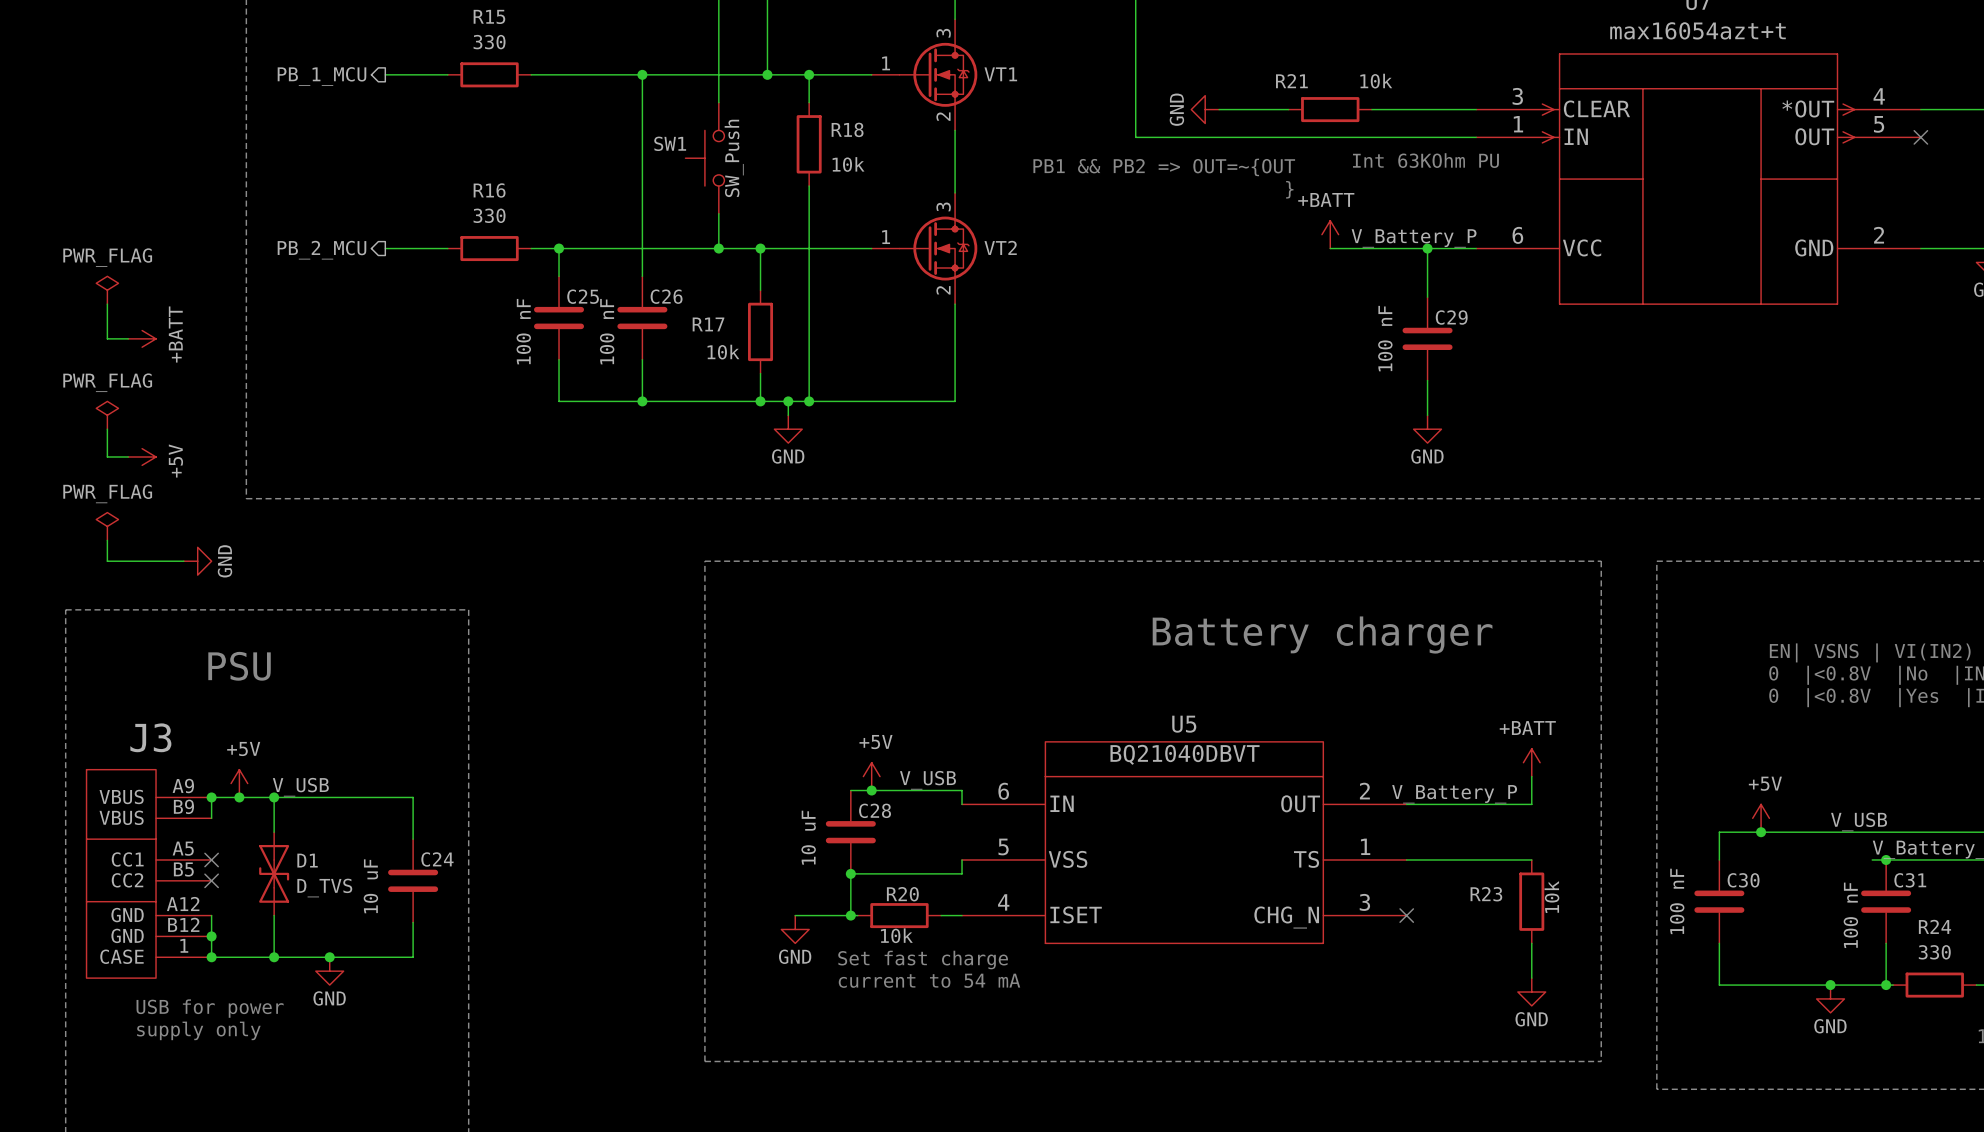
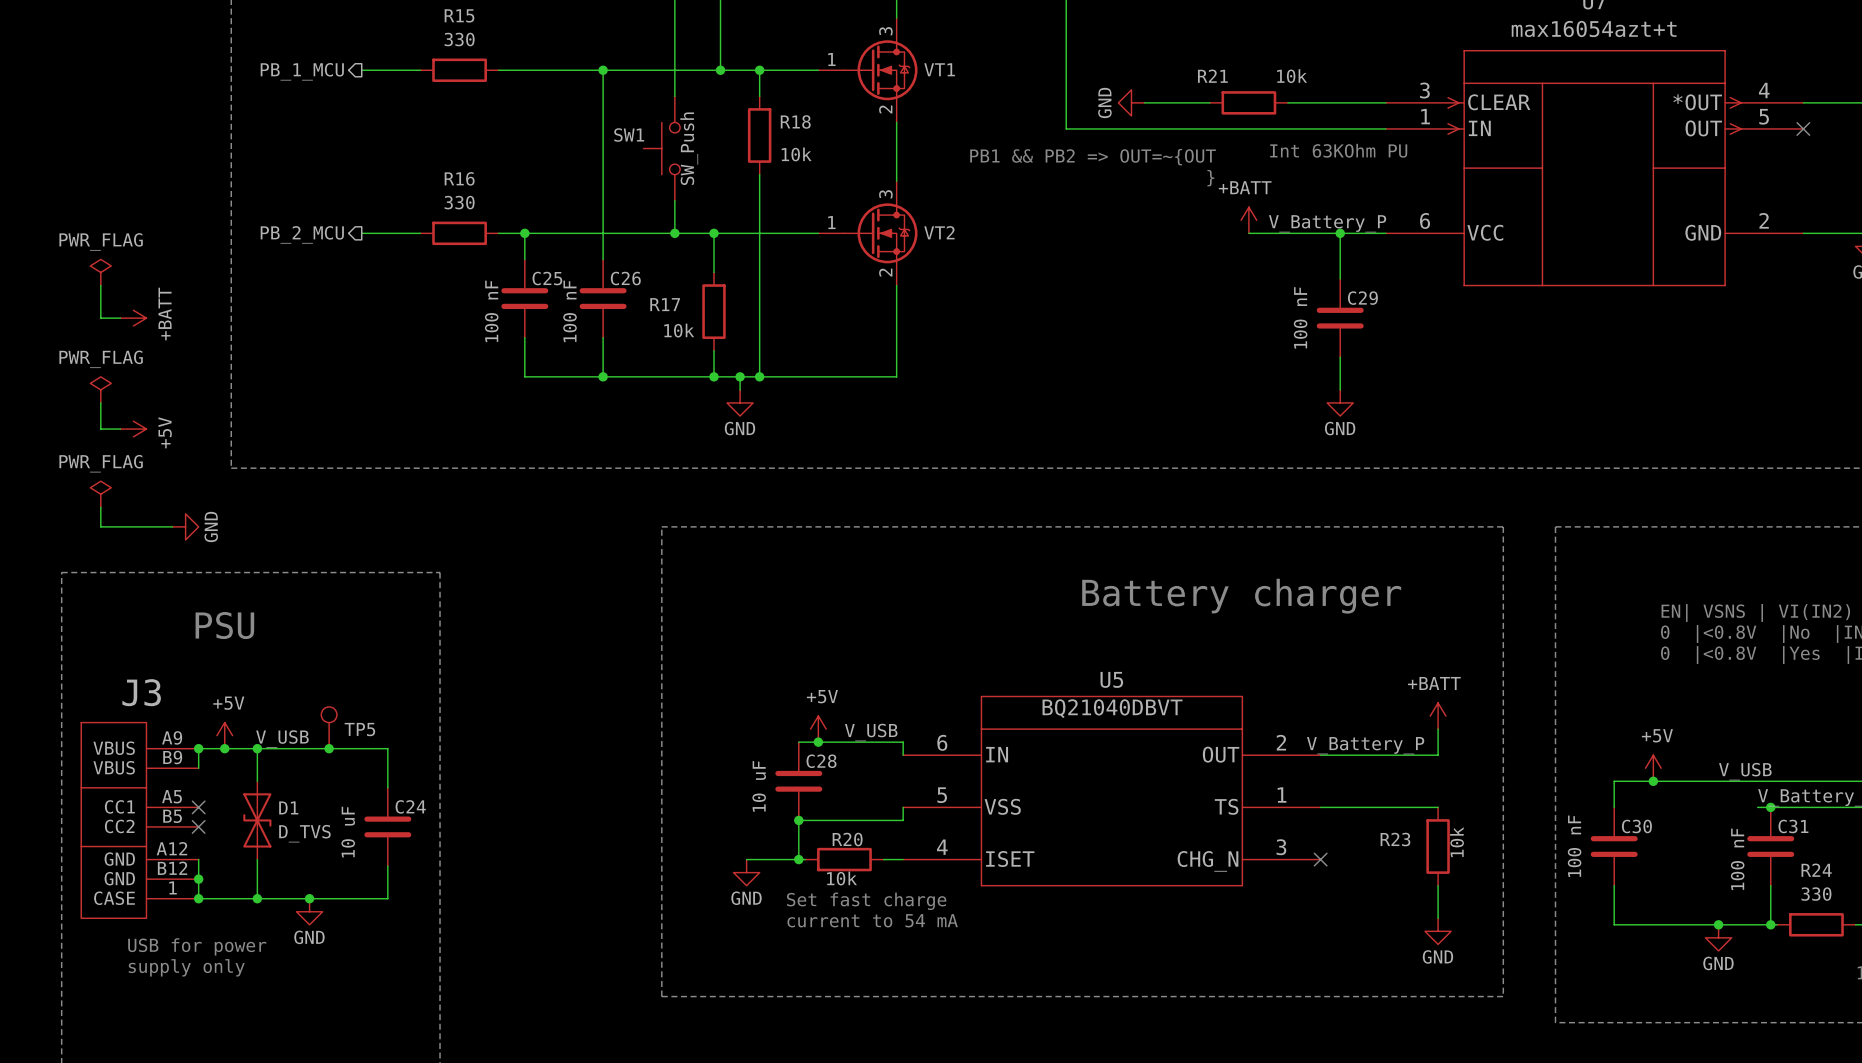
TP5: none -> (329, 727)
junction: none -> (329, 748)

